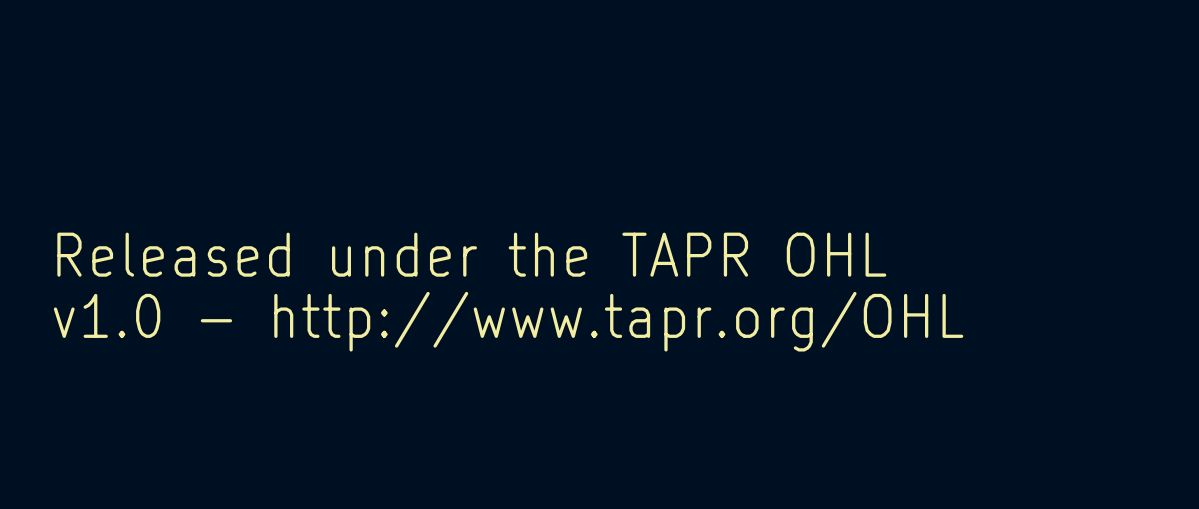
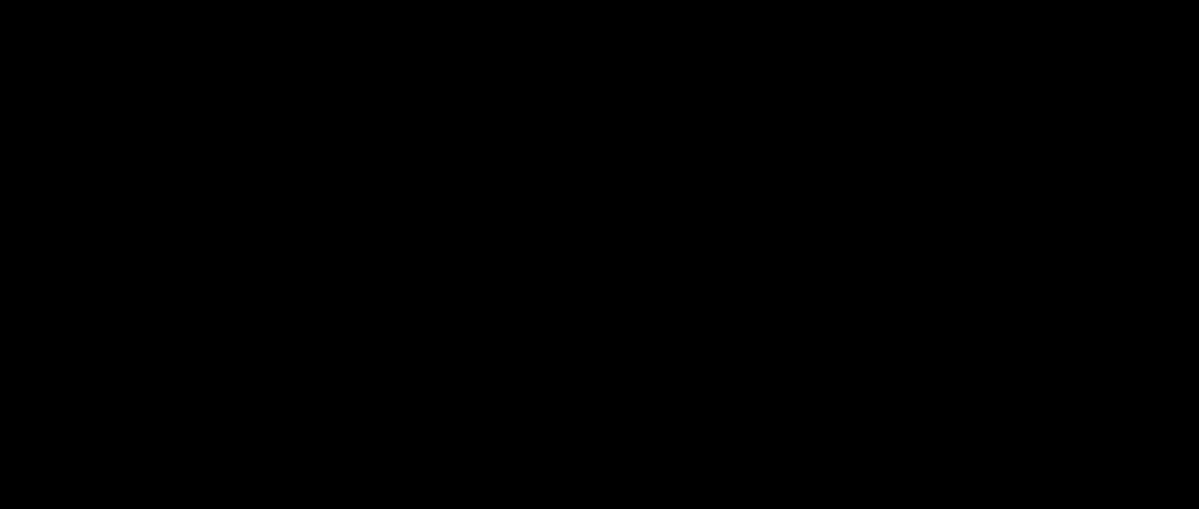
text: Released under the TAPR OHL (471, 254) -> none
text: v1.0 - http://www.tapr.org/OHL (508, 321) -> none

